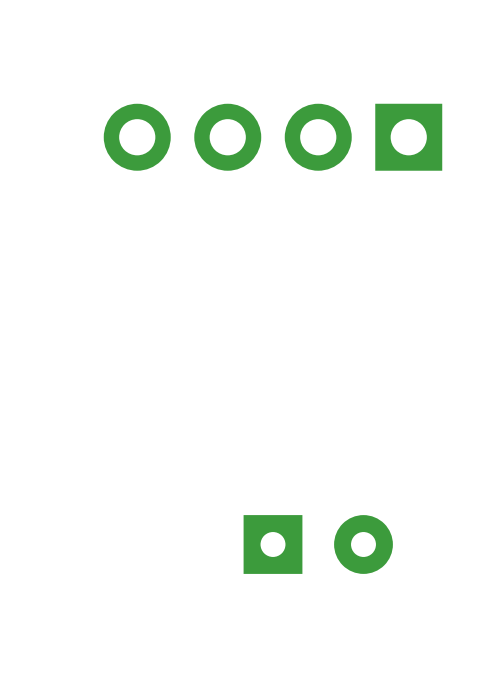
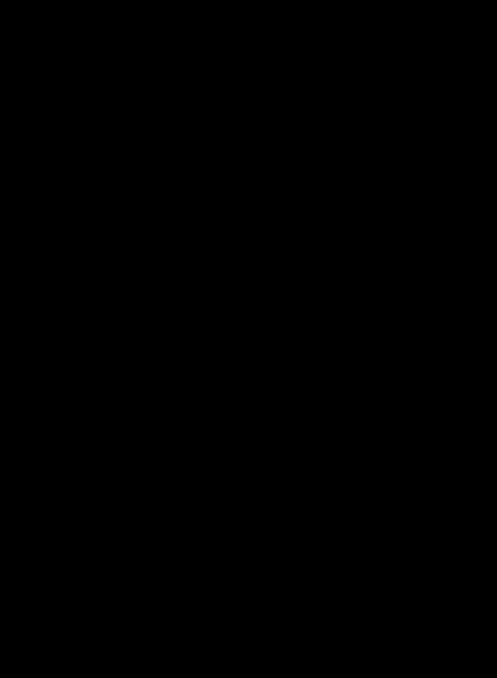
part: (272, 137) -> none
part: (318, 544) -> none

